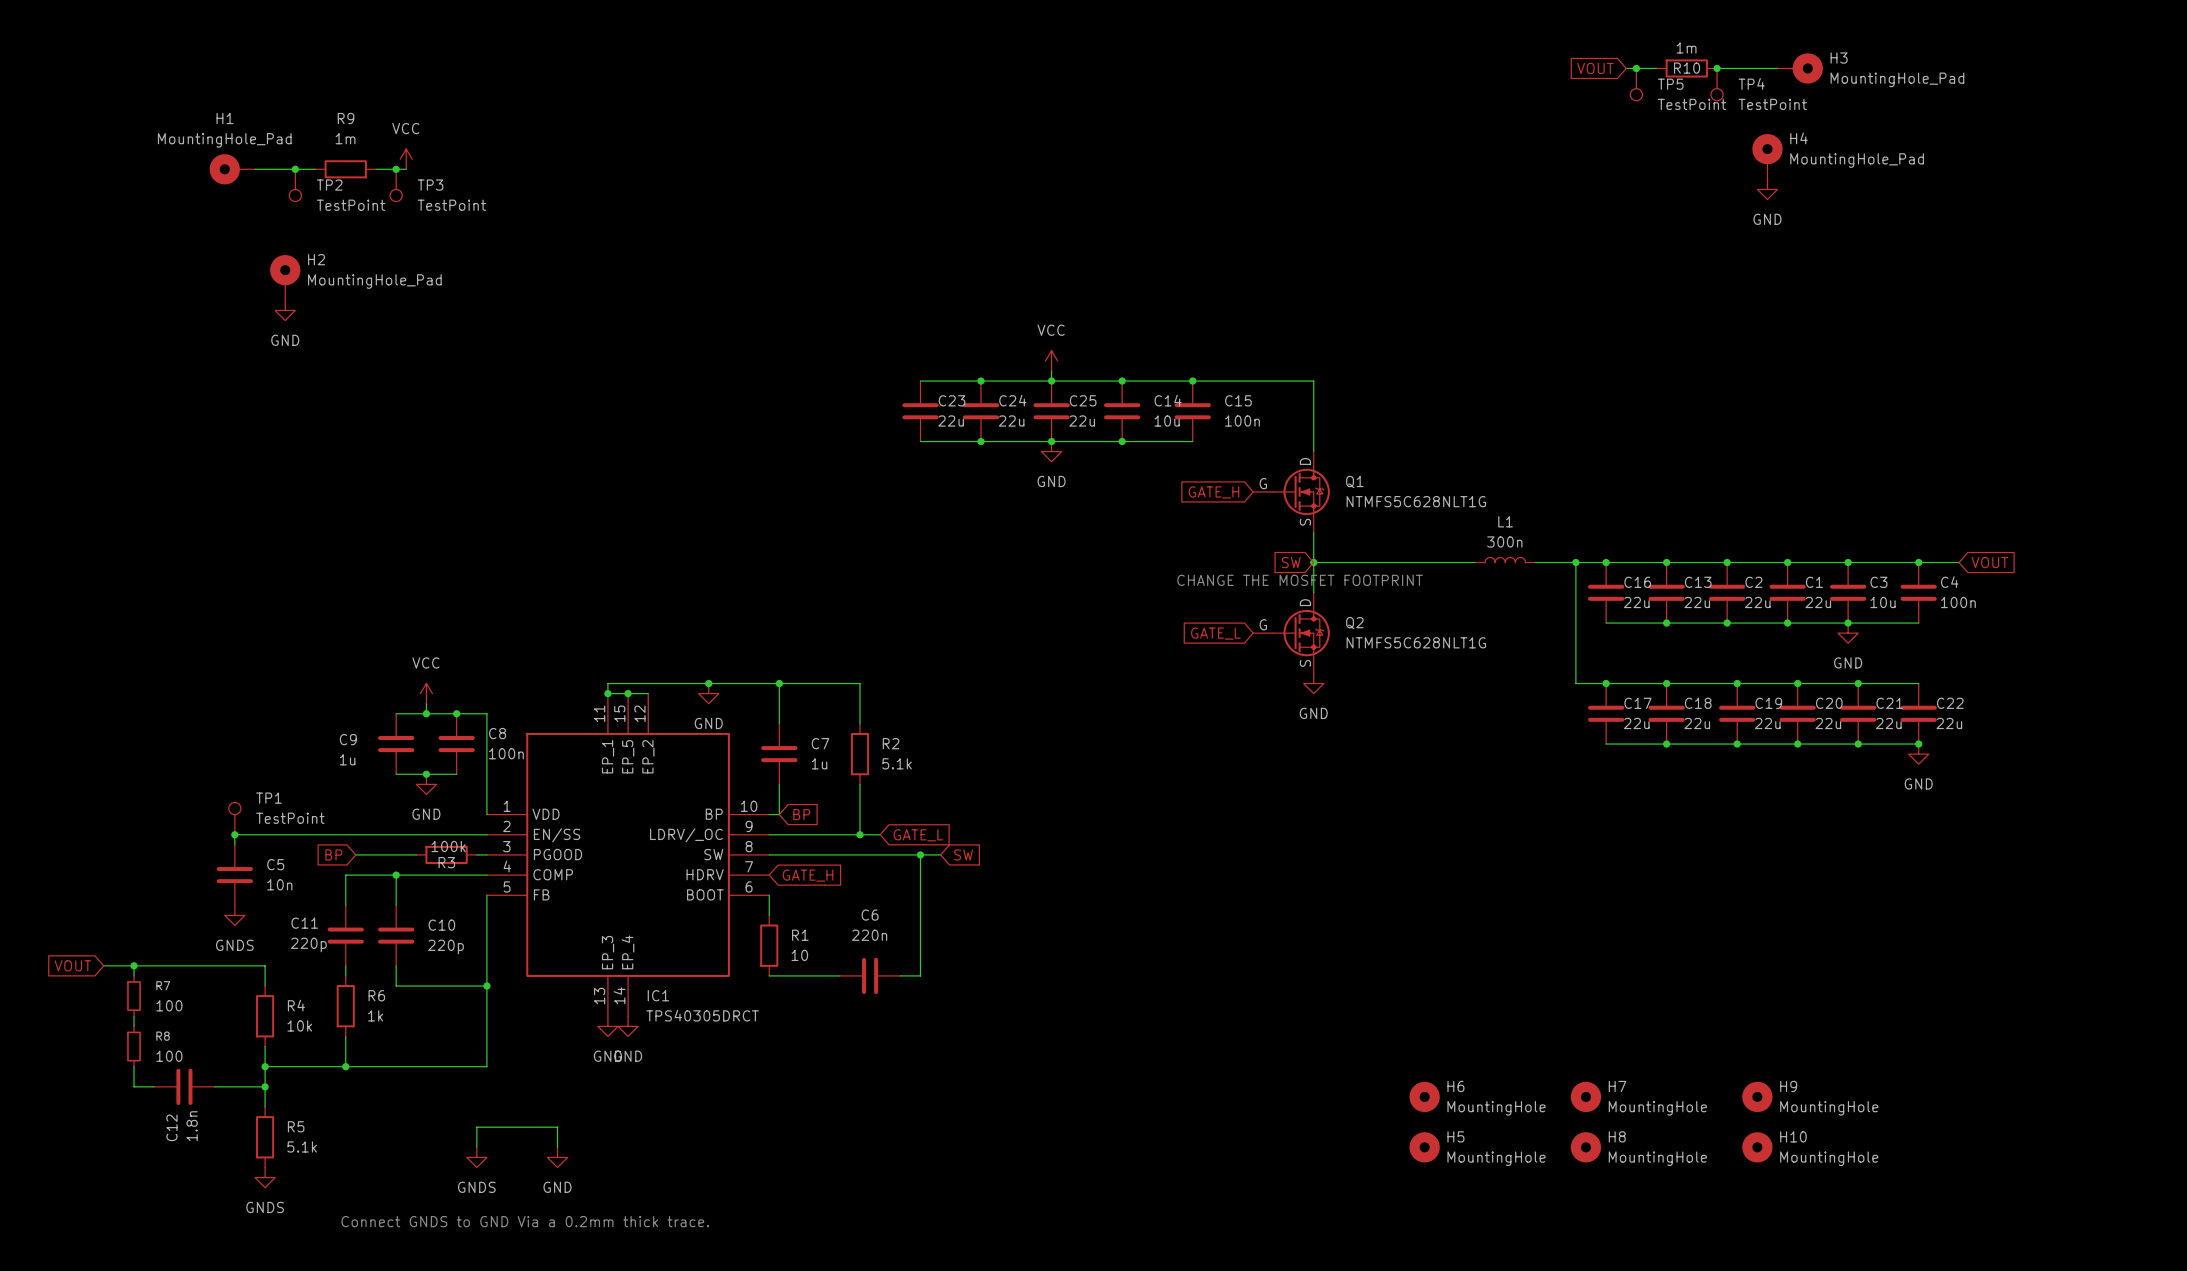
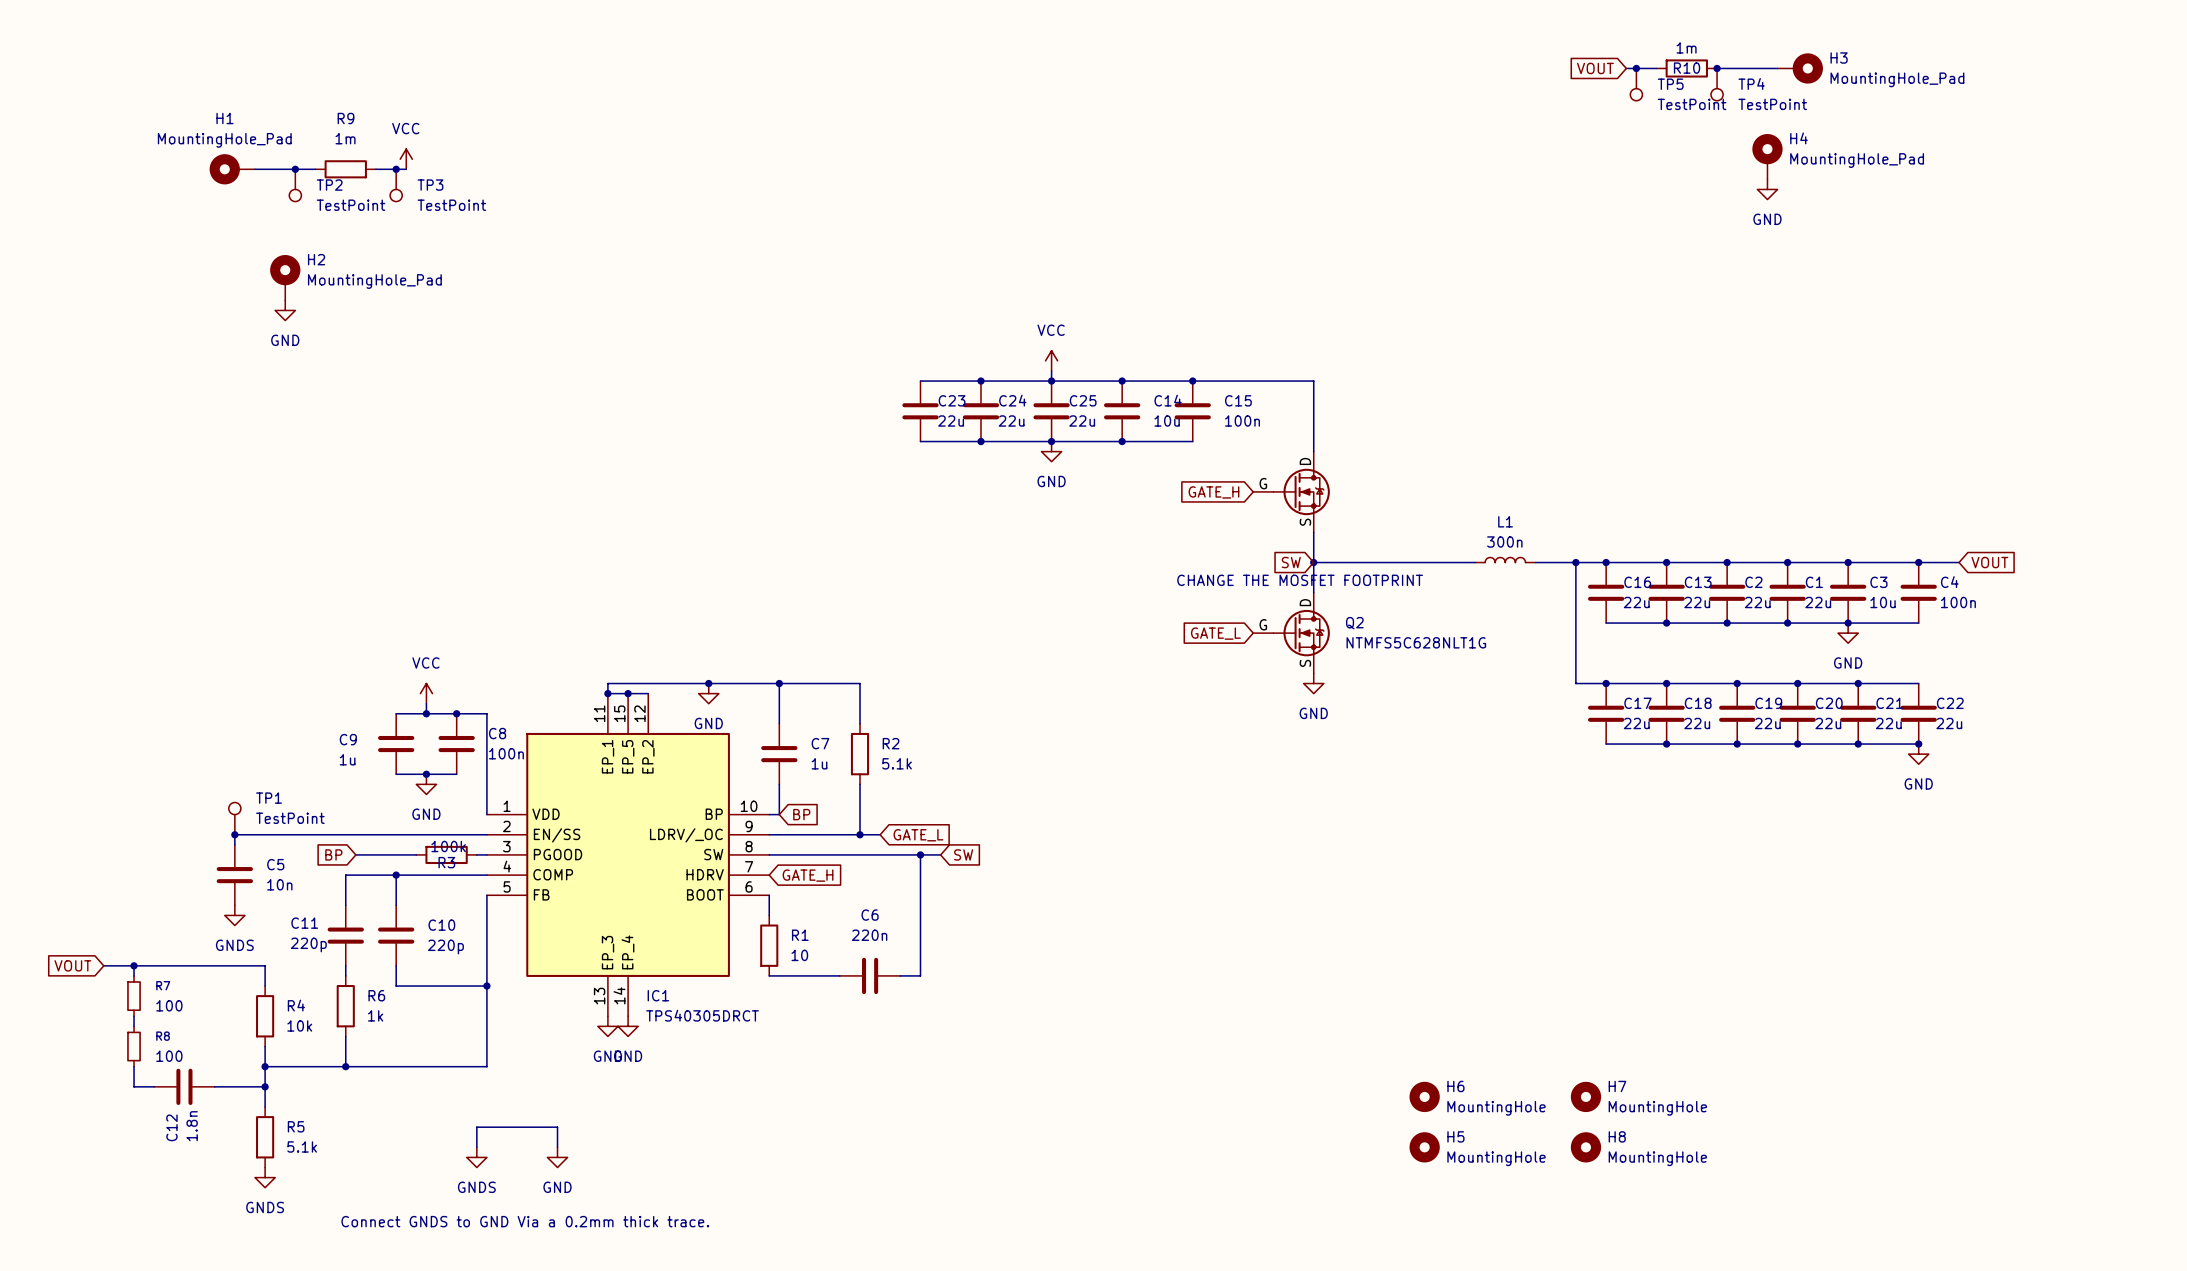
Q1 name: Q1 (1354, 481) -> none
Q1 value: NTMFS5C628NLT1G (1416, 501) -> none
H9: MountingHole (1757, 1096) -> none
H10: MountingHole (1757, 1147) -> none

